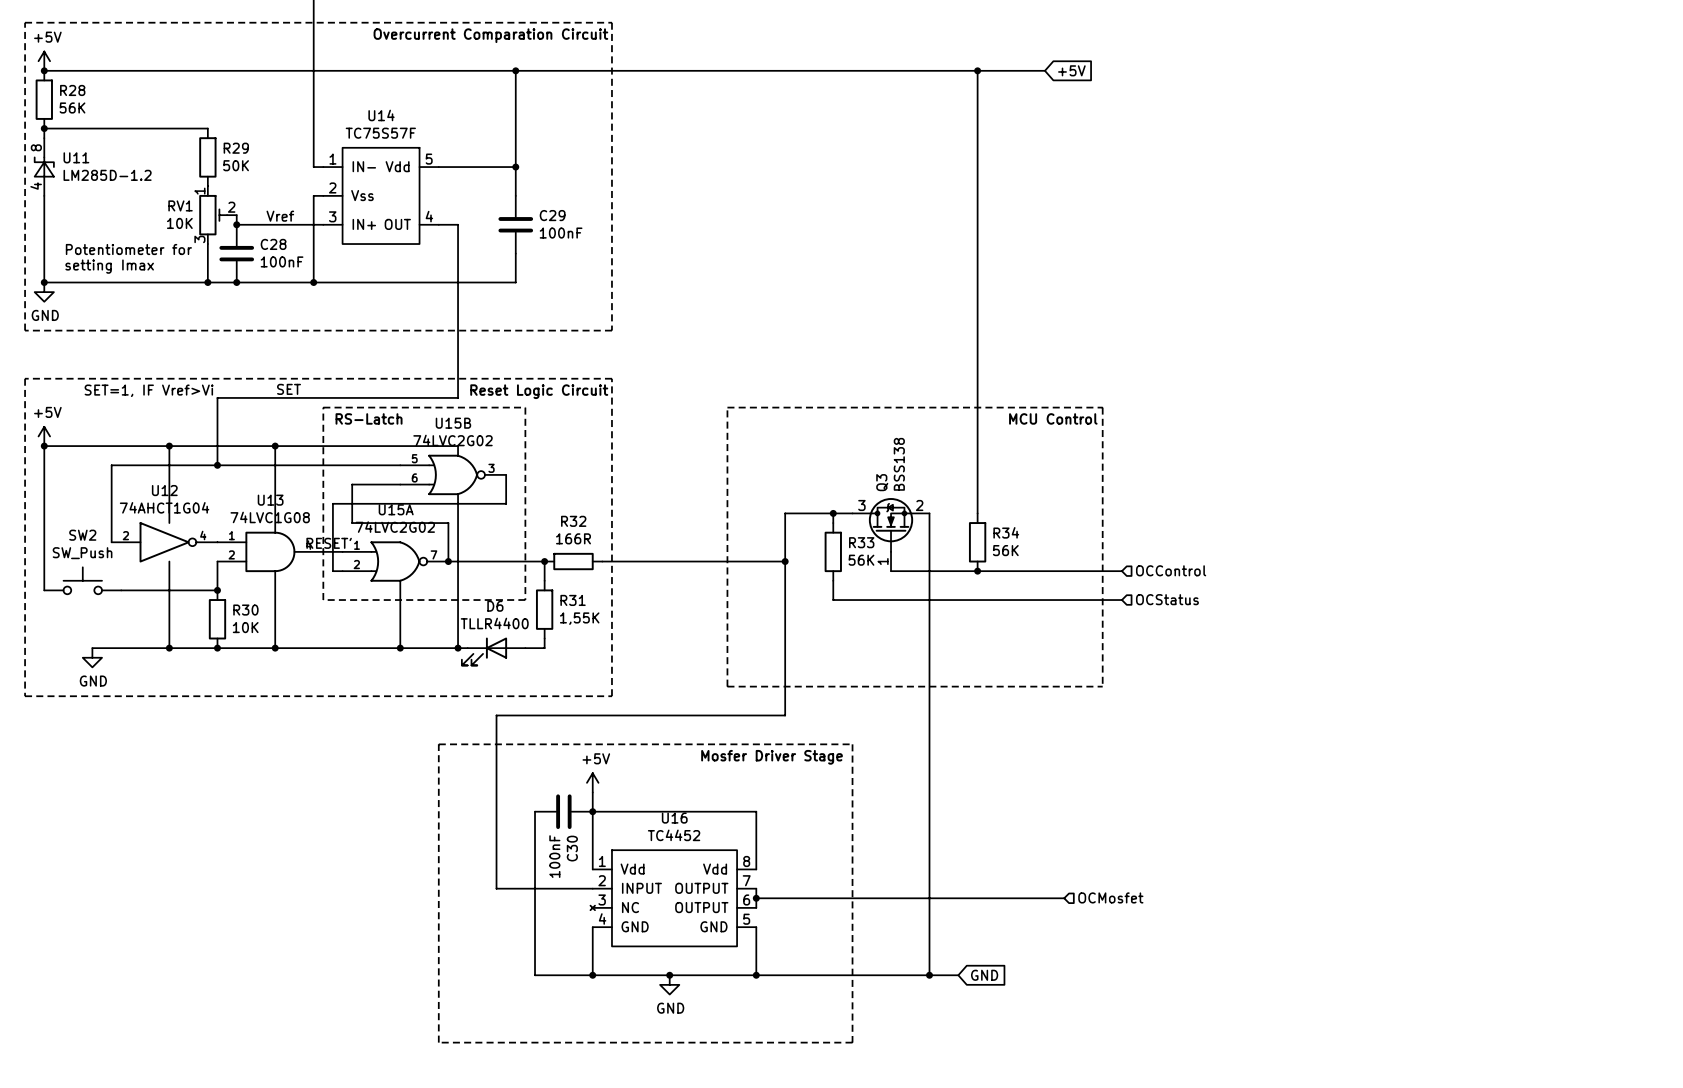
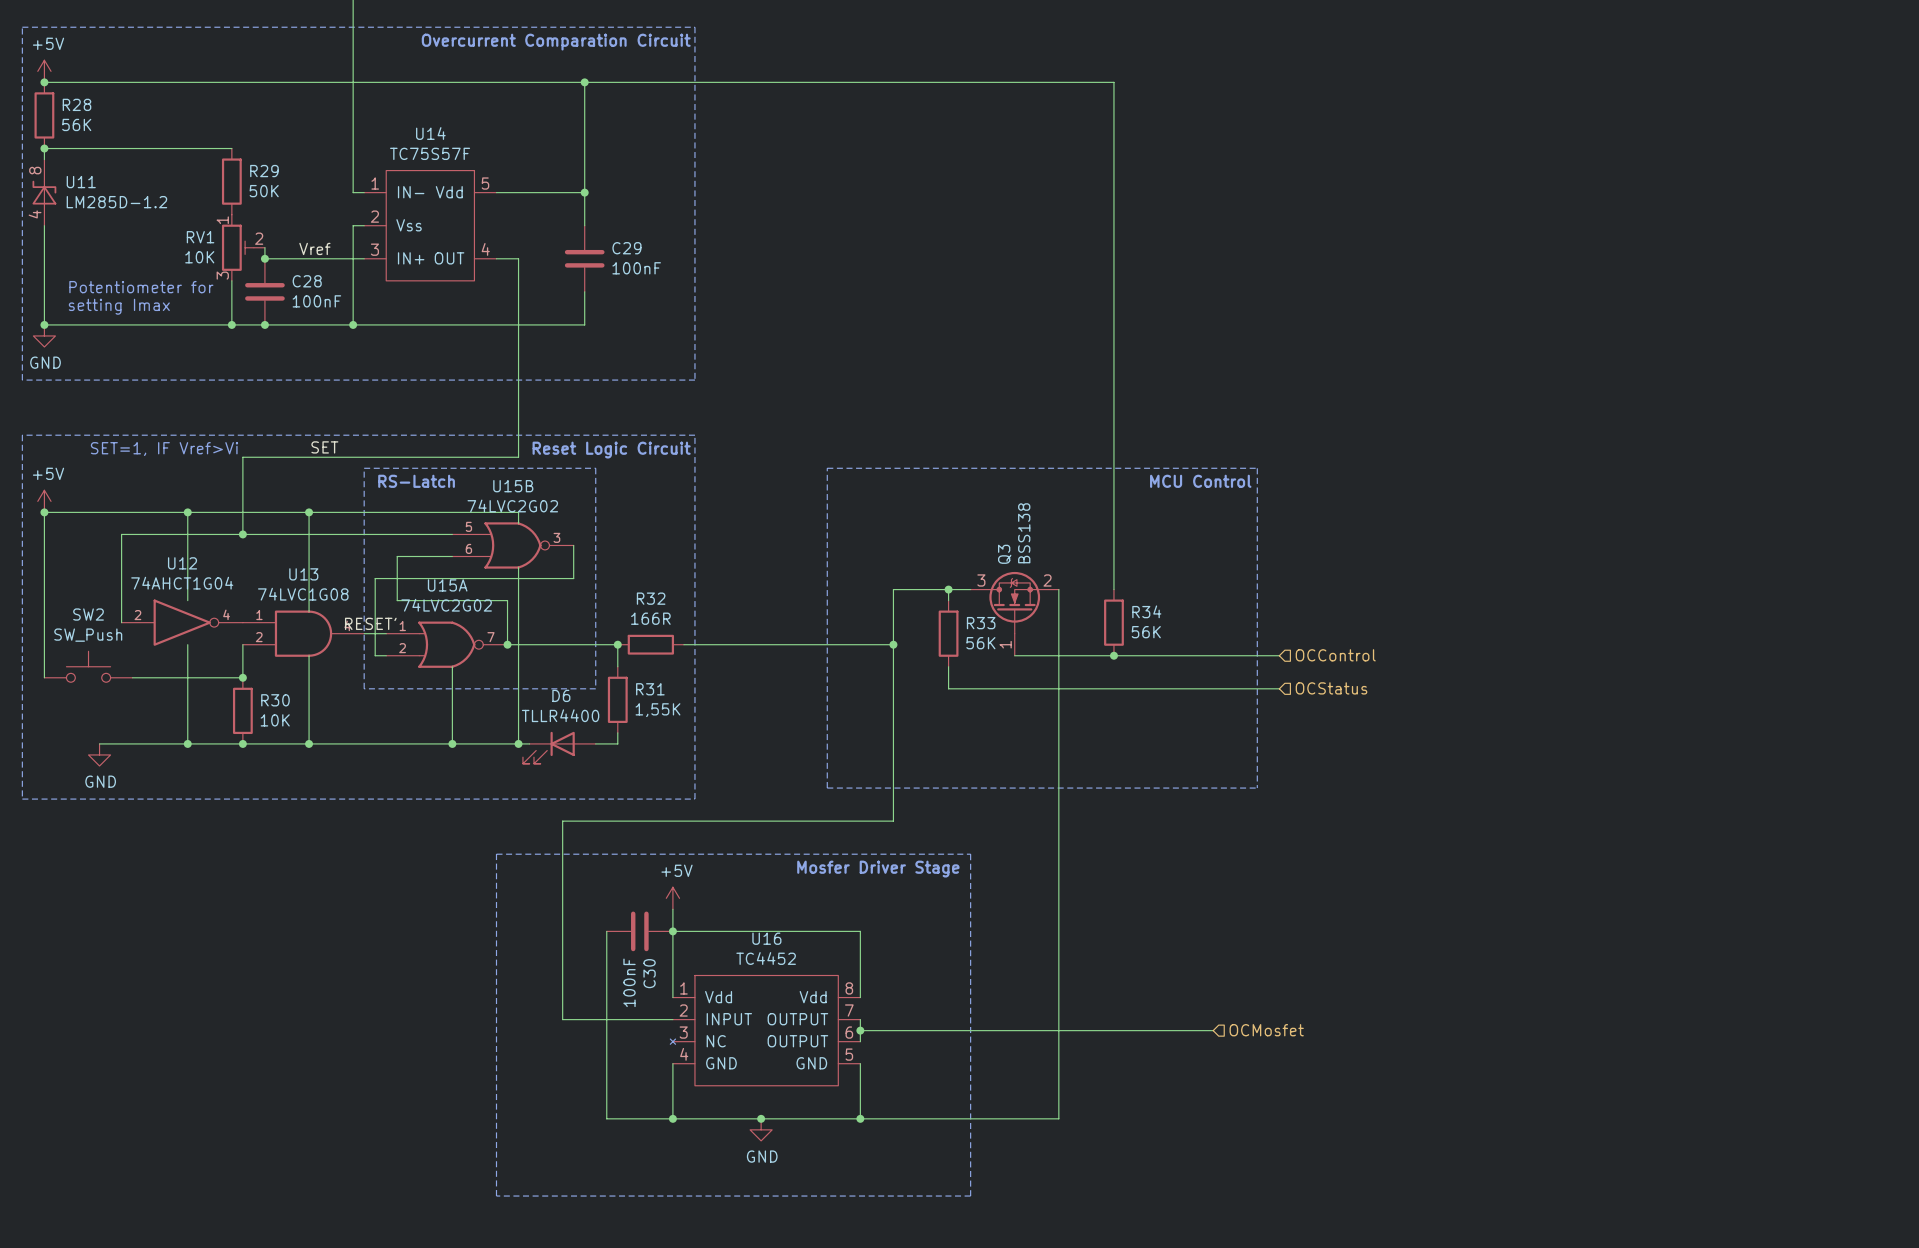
wire: (977, 70) (1044, 70) -> none
junction: (977, 70) -> none
global label: +5V (1071, 70) -> none
wire: (929, 975) (958, 975) -> none
junction: (929, 975) -> none
global label: GND (984, 975) -> none

